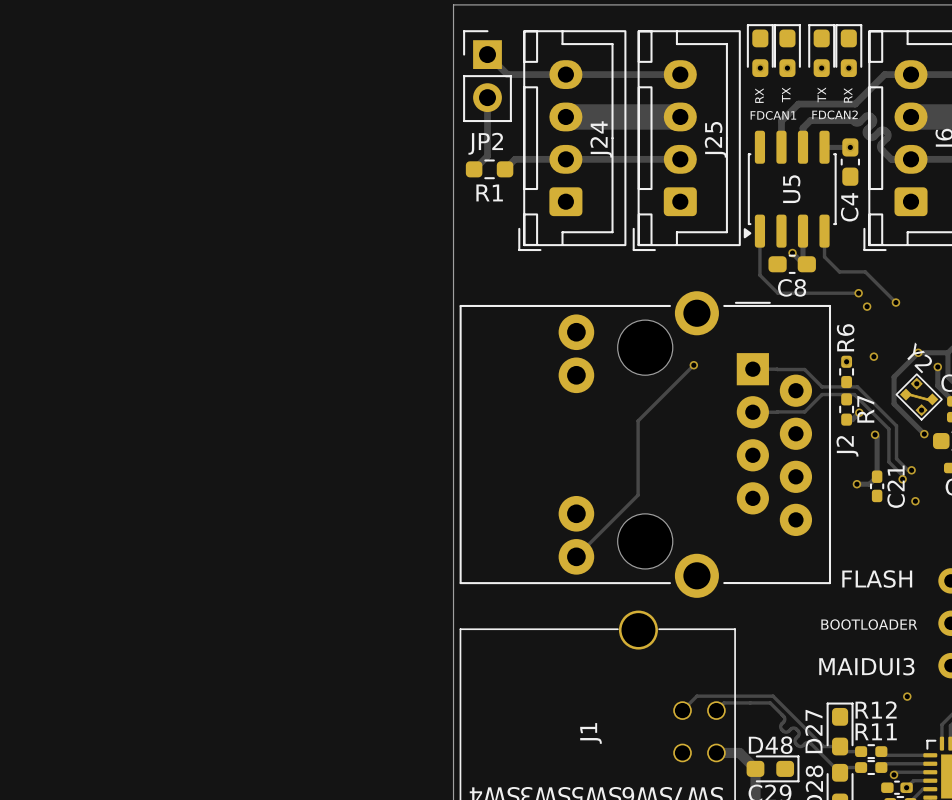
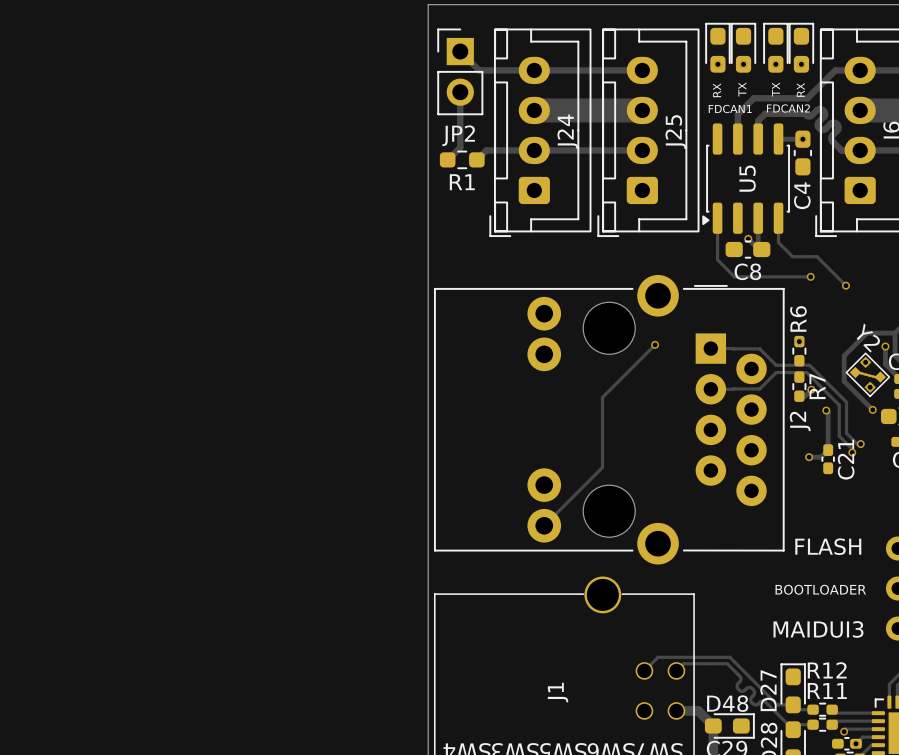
via: (867, 306) -> none
via: (918, 352) -> none
via: (873, 356) -> none
via: (915, 501) -> none
via: (907, 696) -> none

